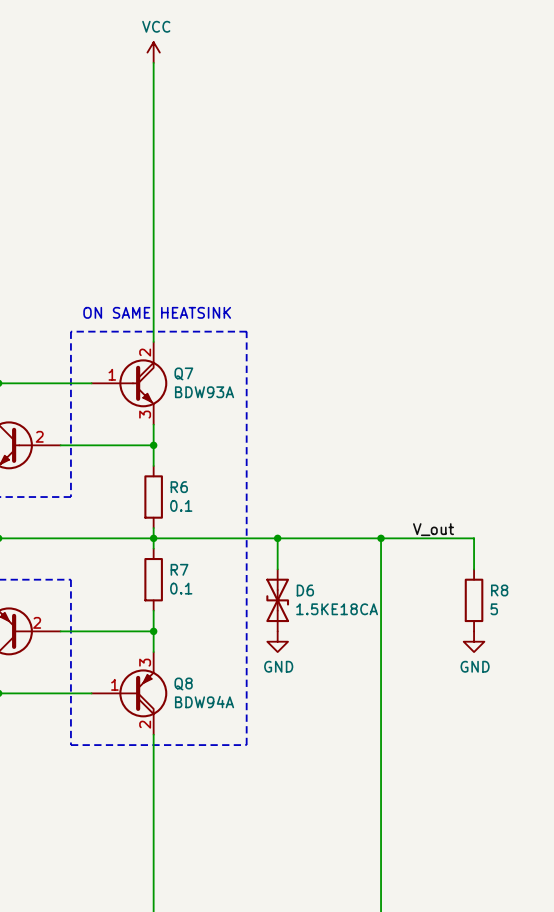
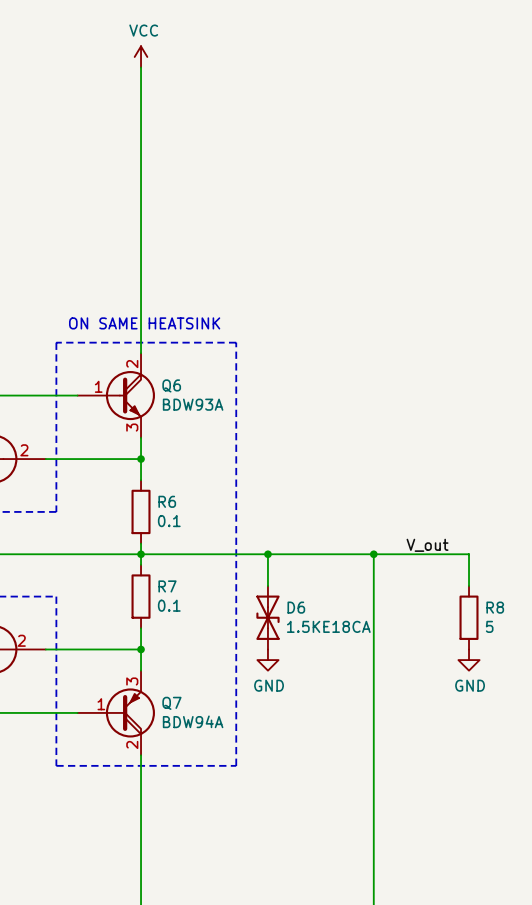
Q7 name: Q7 (183, 373) -> Q6 (171, 385)
Q8 name: Q8 (183, 683) -> Q7 (171, 703)

